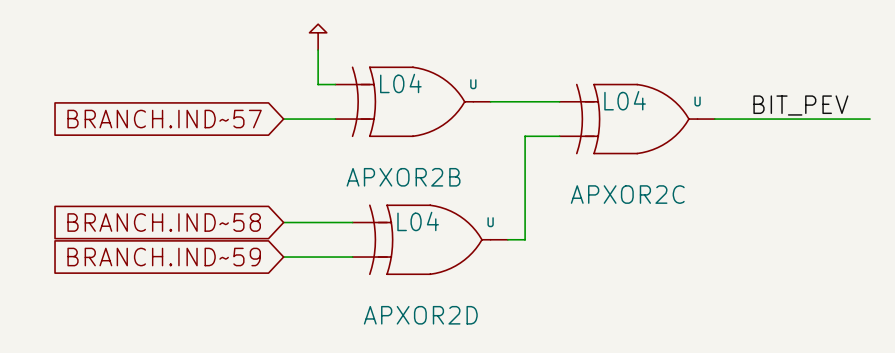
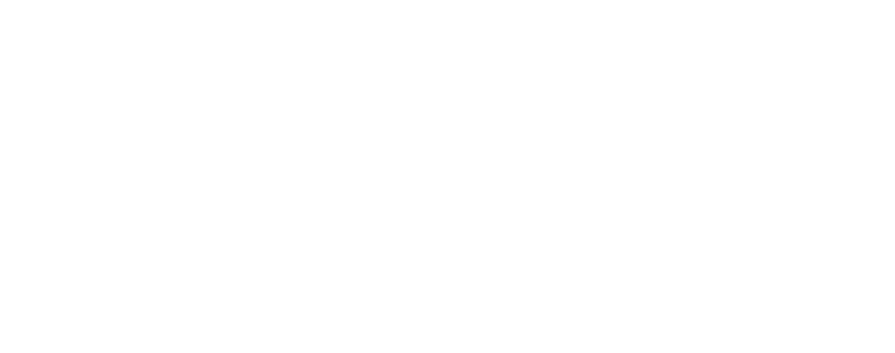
power symbol: (318, 36) -> none
wire: (318, 50) (318, 84) (335, 84) -> none
U: (412, 101) -> none
wire: (490, 101) (559, 101) -> none
label: BIT_PEV (800, 105) -> none
global label: BRANCH.IND~57 (164, 119) -> none
wire: (283, 119) (335, 119) -> none
U: (637, 119) -> none
wire: (714, 119) (870, 119) -> none
wire: (559, 136) (525, 136) (525, 239) (507, 239) -> none
global label: BRANCH.IND~58 (164, 222) -> none
wire: (283, 222) (352, 222) -> none
U: (430, 239) -> none
global label: BRANCH.IND~59 (164, 257) -> none
wire: (283, 257) (352, 257) -> none

